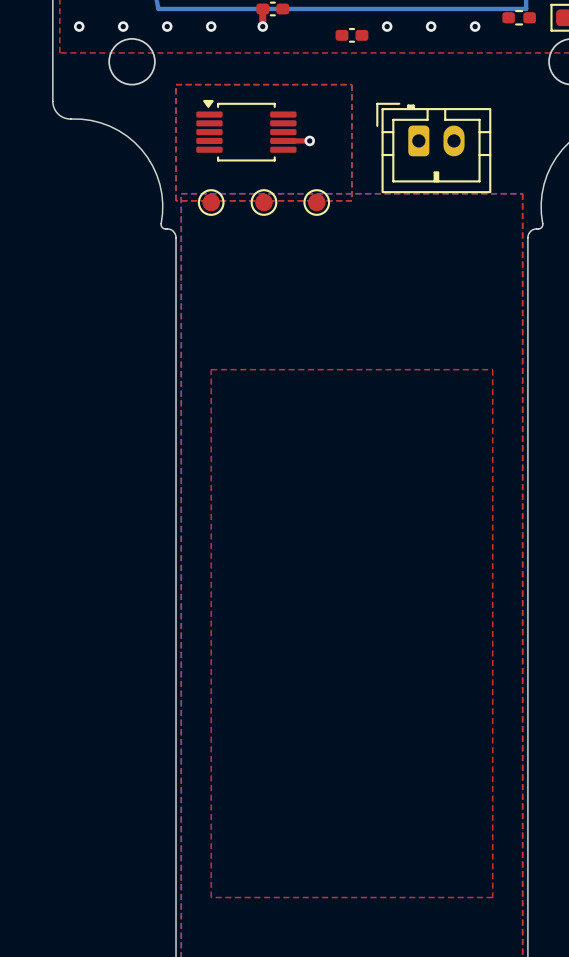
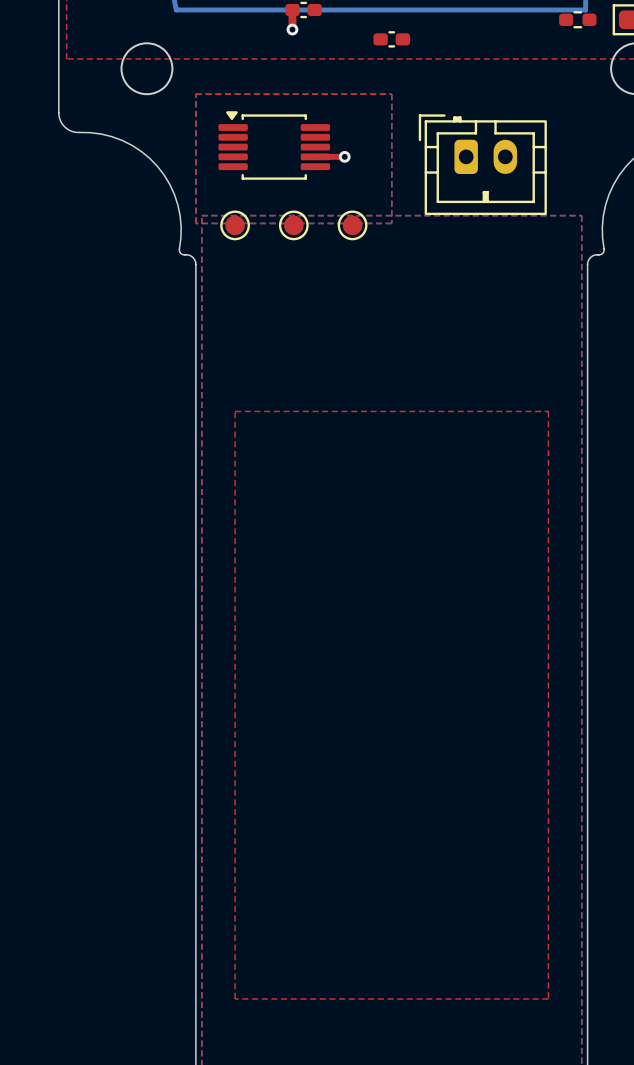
via: (79, 26) -> none
via: (123, 26) -> none
via: (167, 26) -> none
via: (211, 26) -> none
via: (387, 26) -> none
via: (431, 26) -> none
via: (475, 26) -> none

